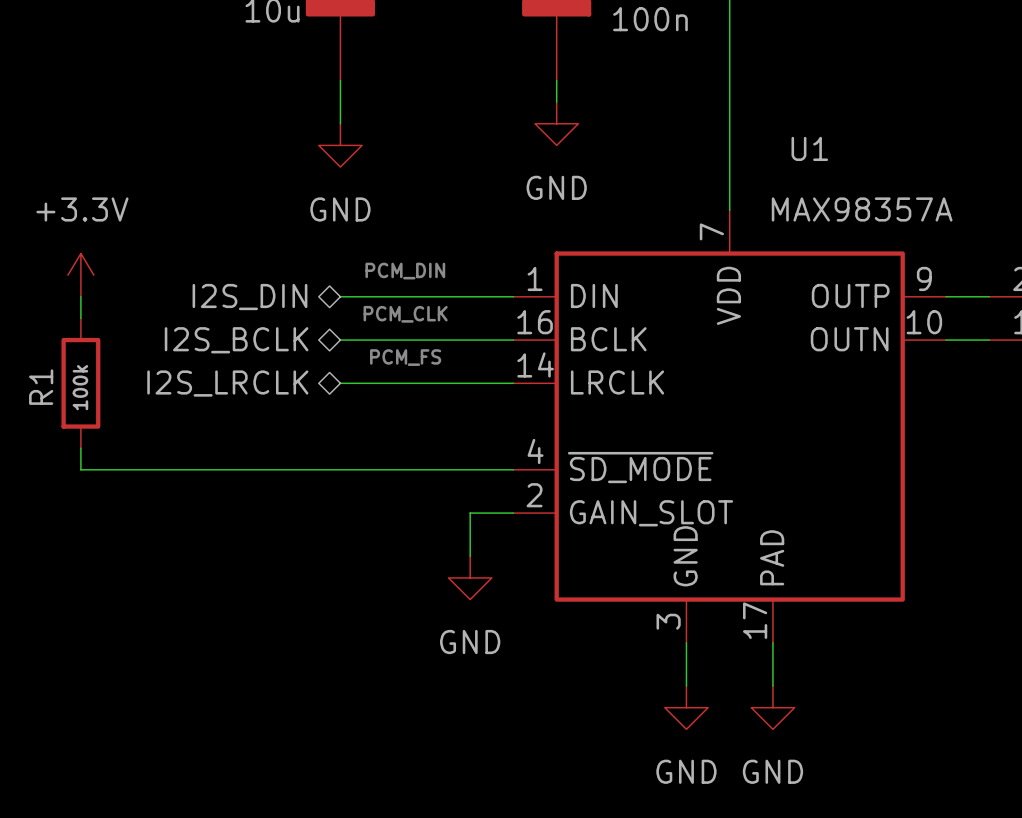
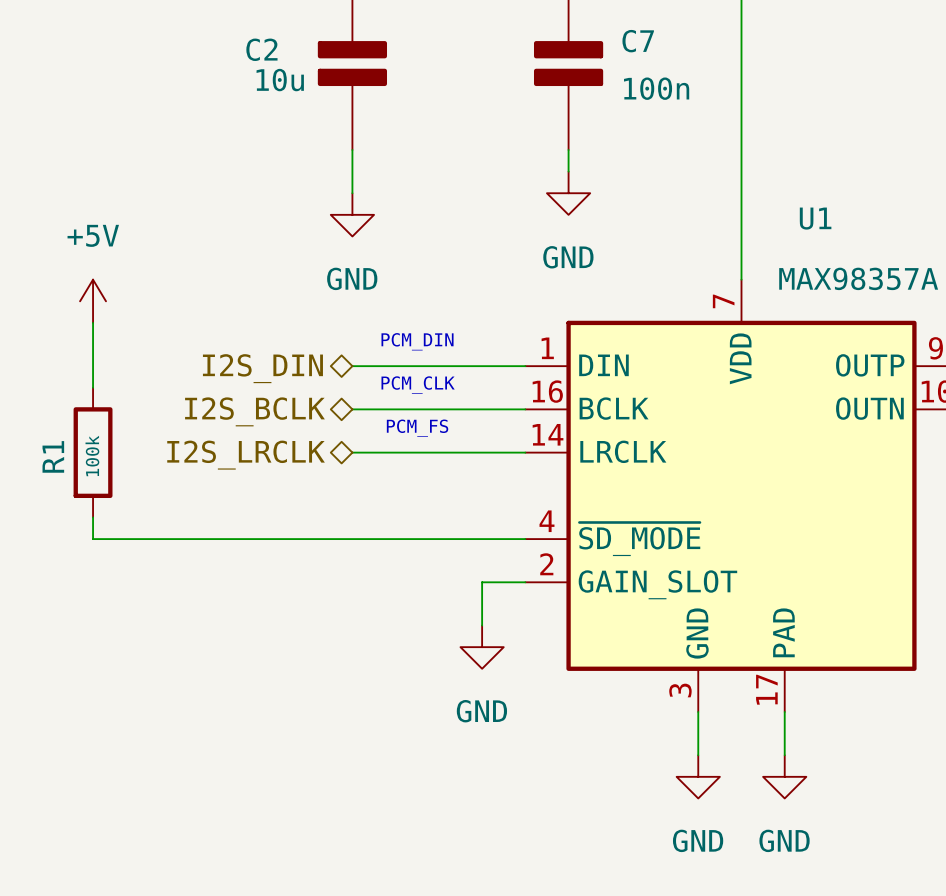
power symbol: none -> +5V (93, 301)
power symbol: +3.3V (80, 275) -> none

